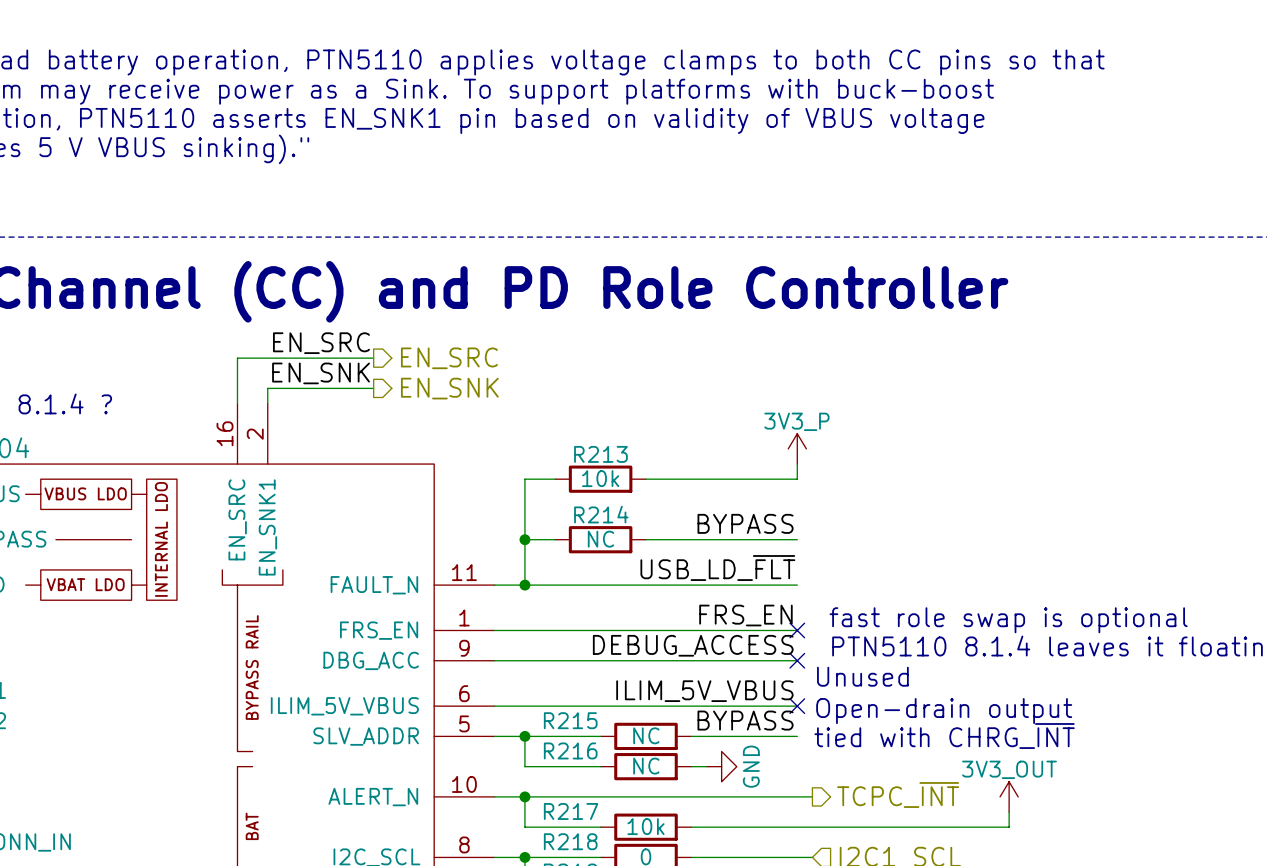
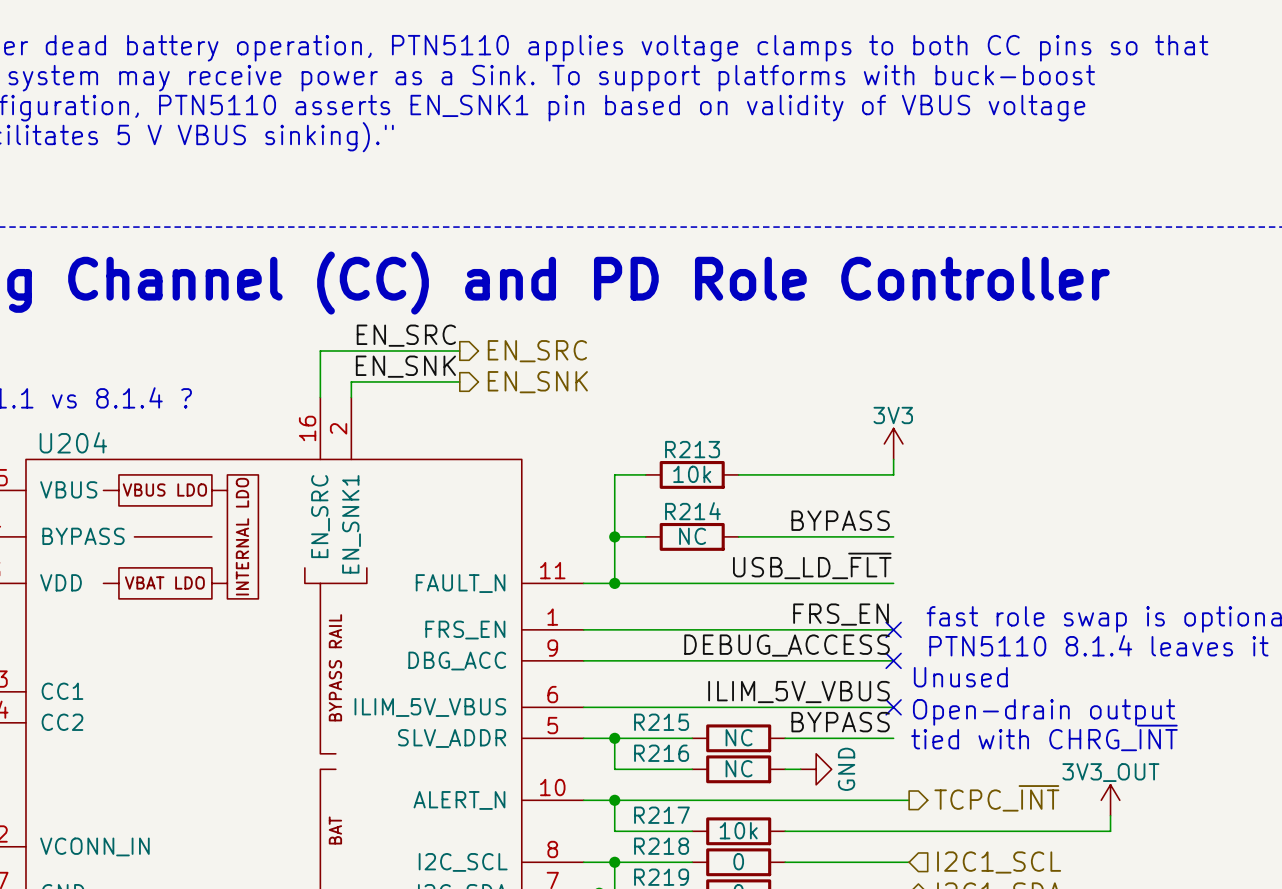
power symbol: 3V3_P (797, 448) -> 3V3 (893, 443)

